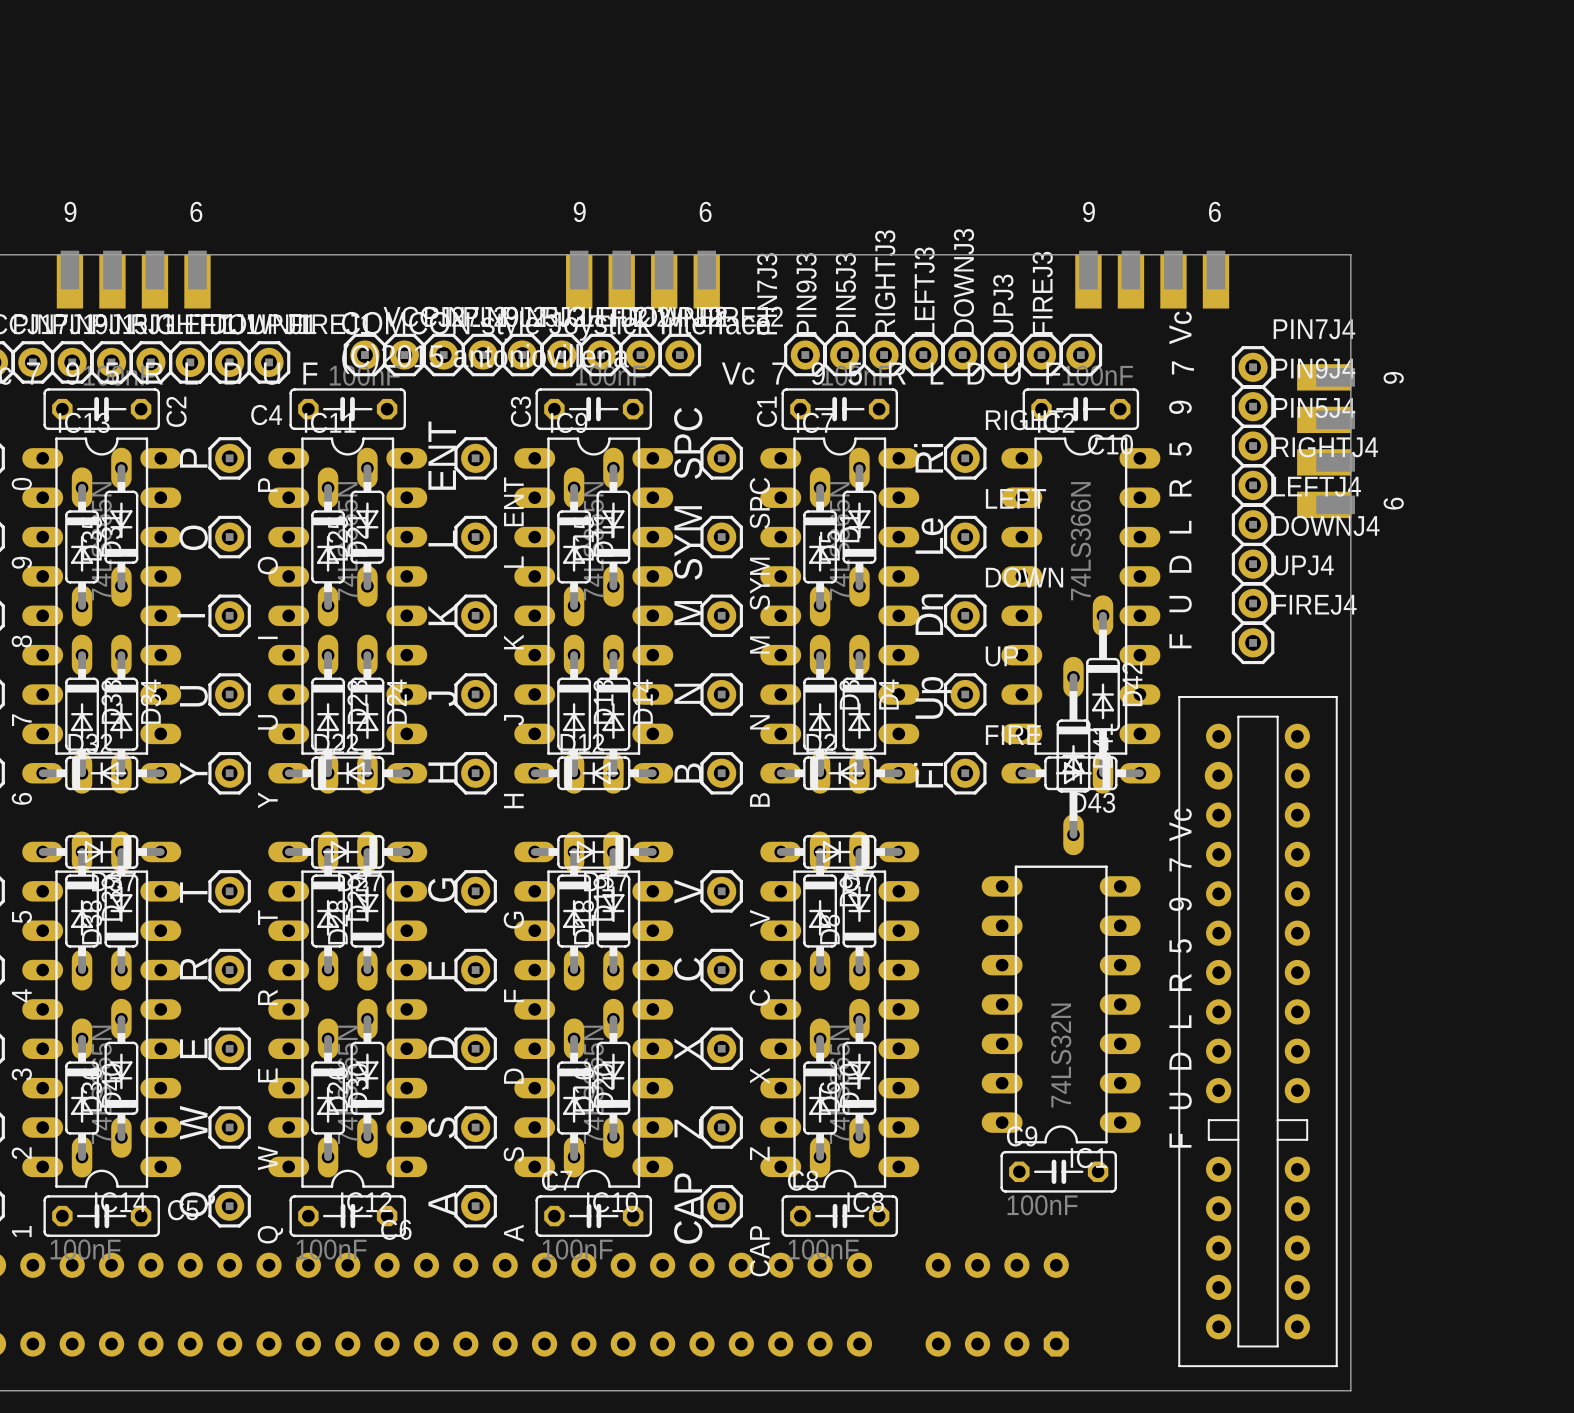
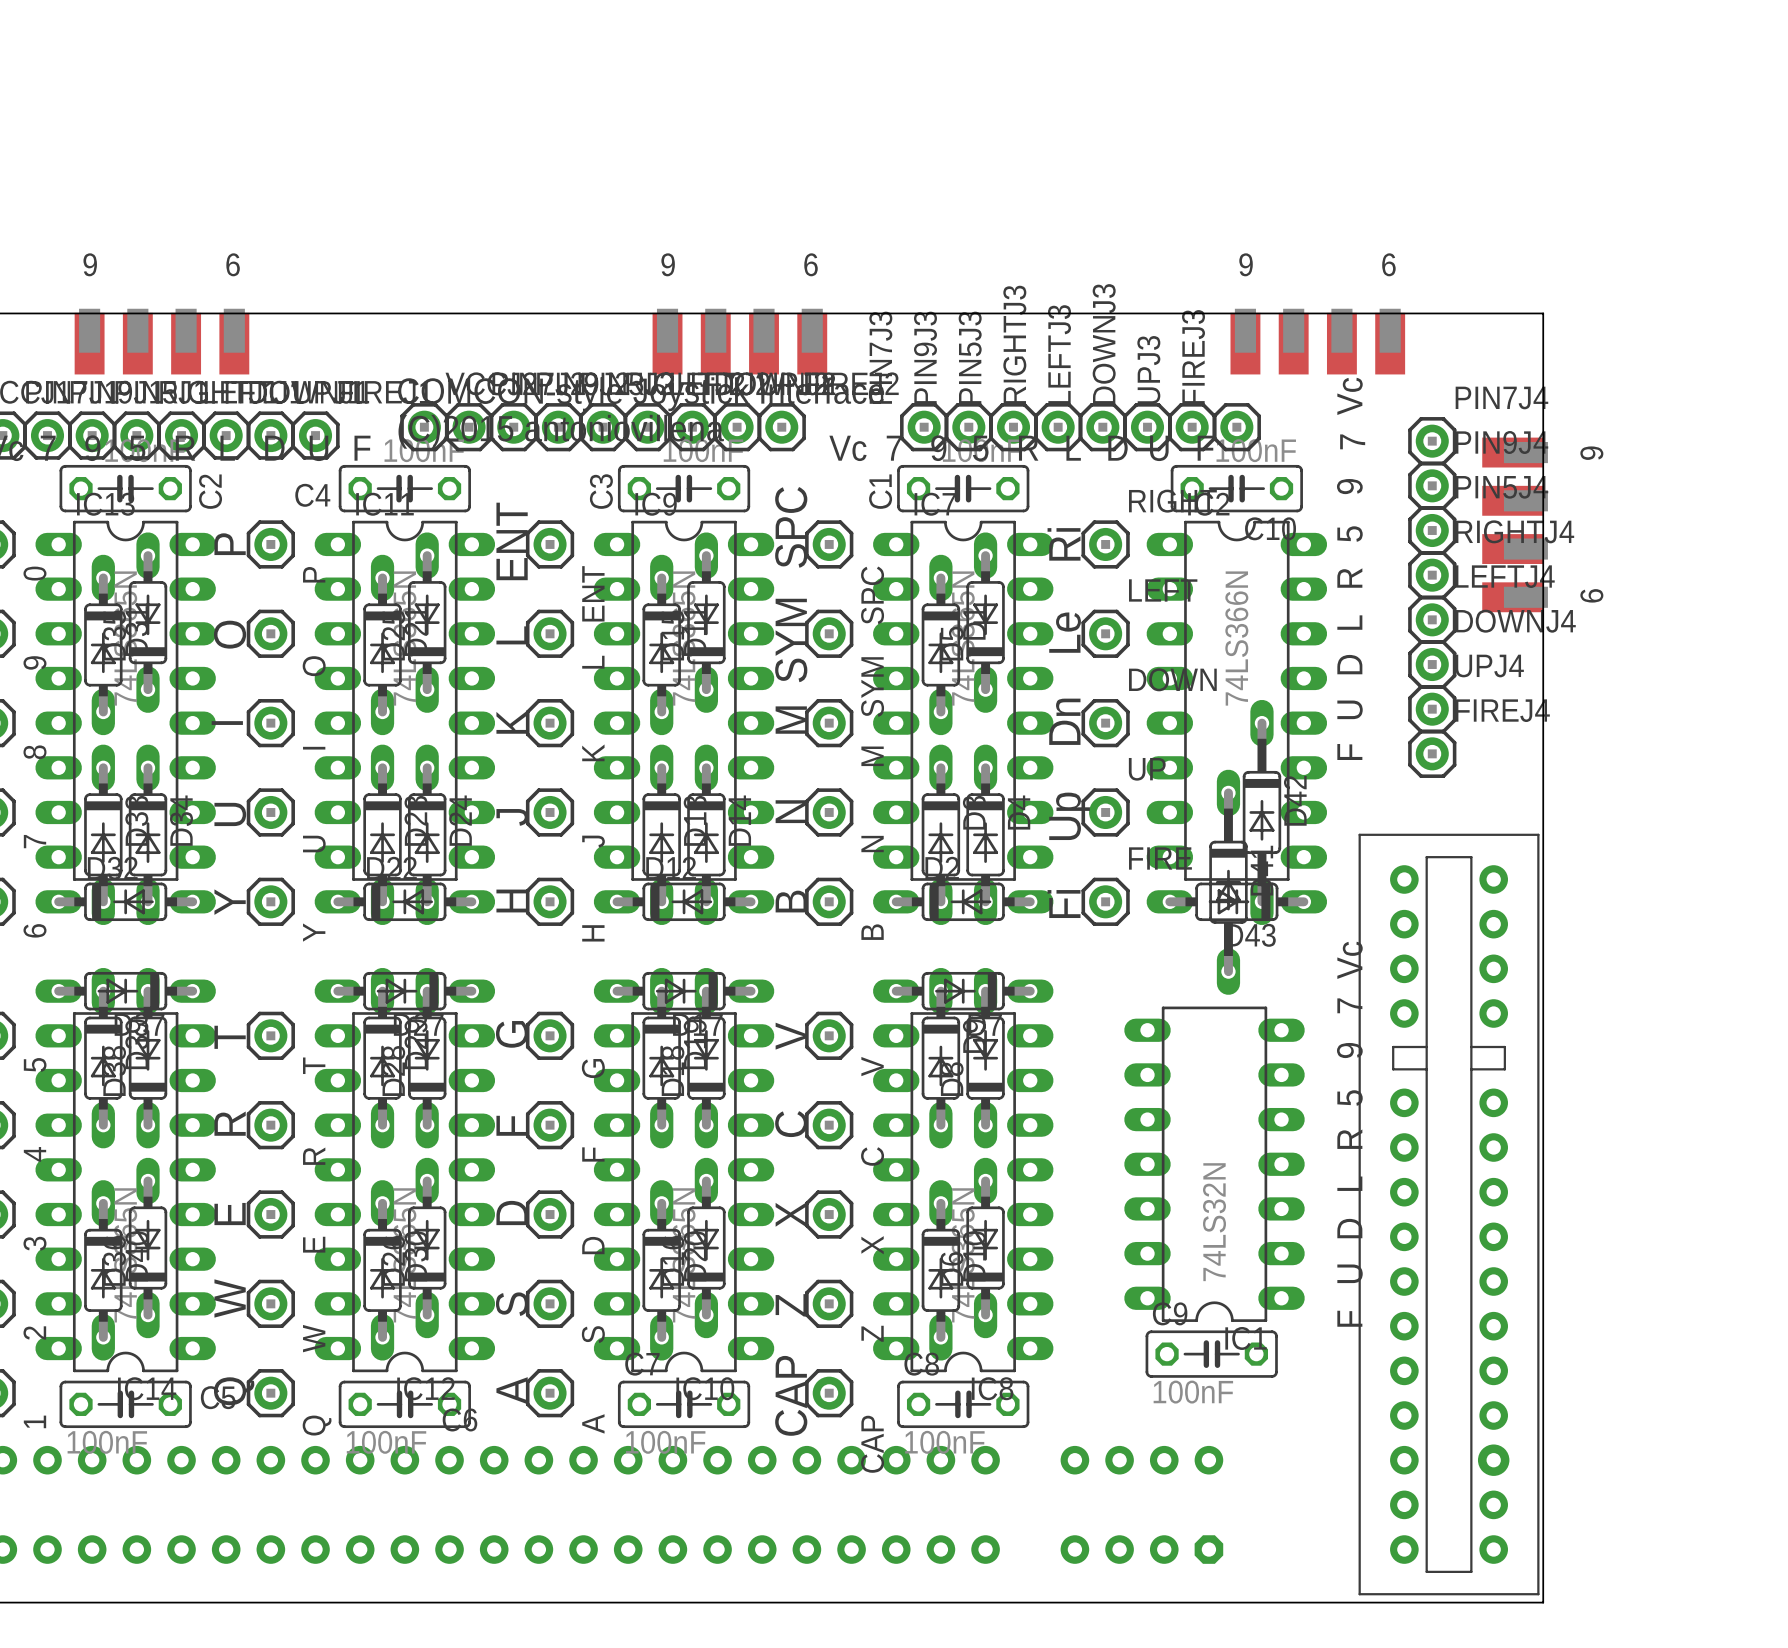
part: (1258, 1031) -> none
part: none -> (1449, 1214)

